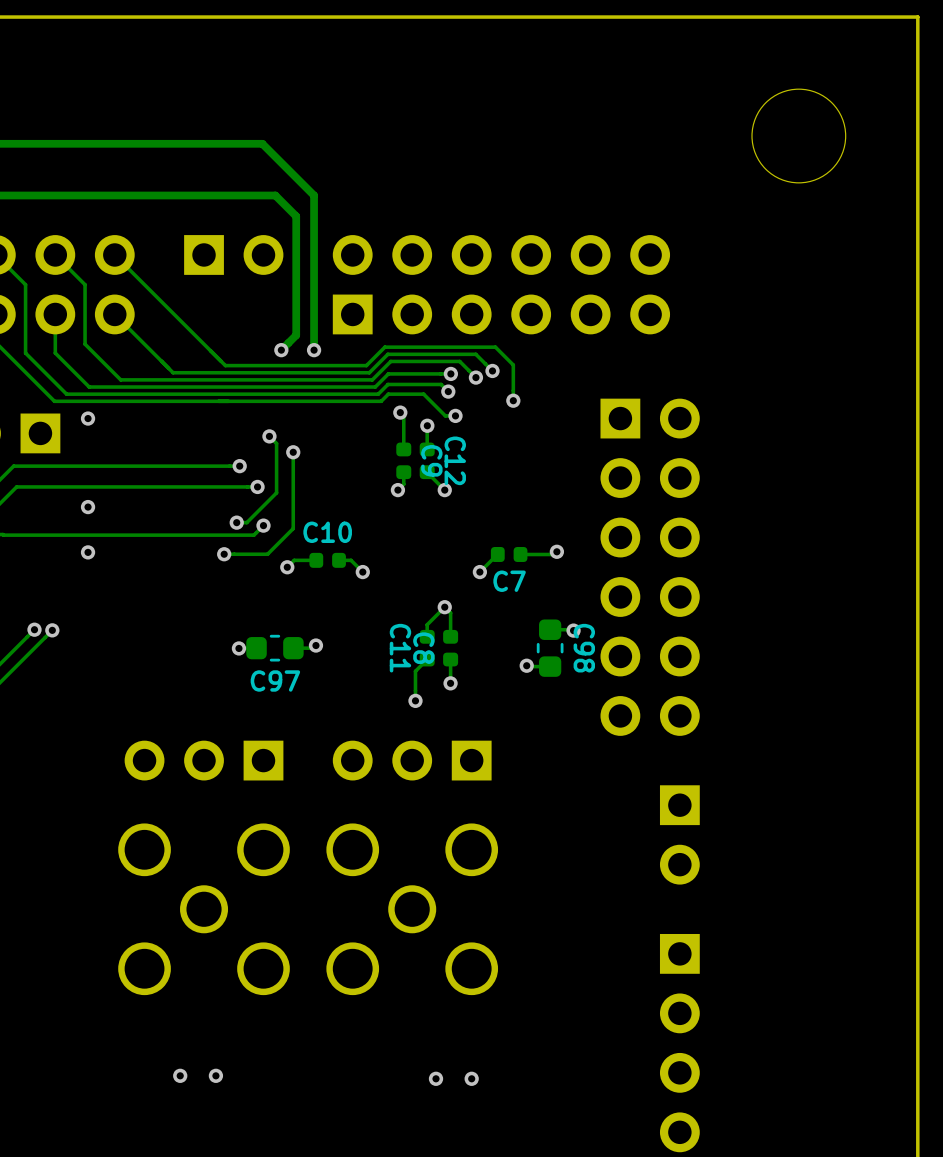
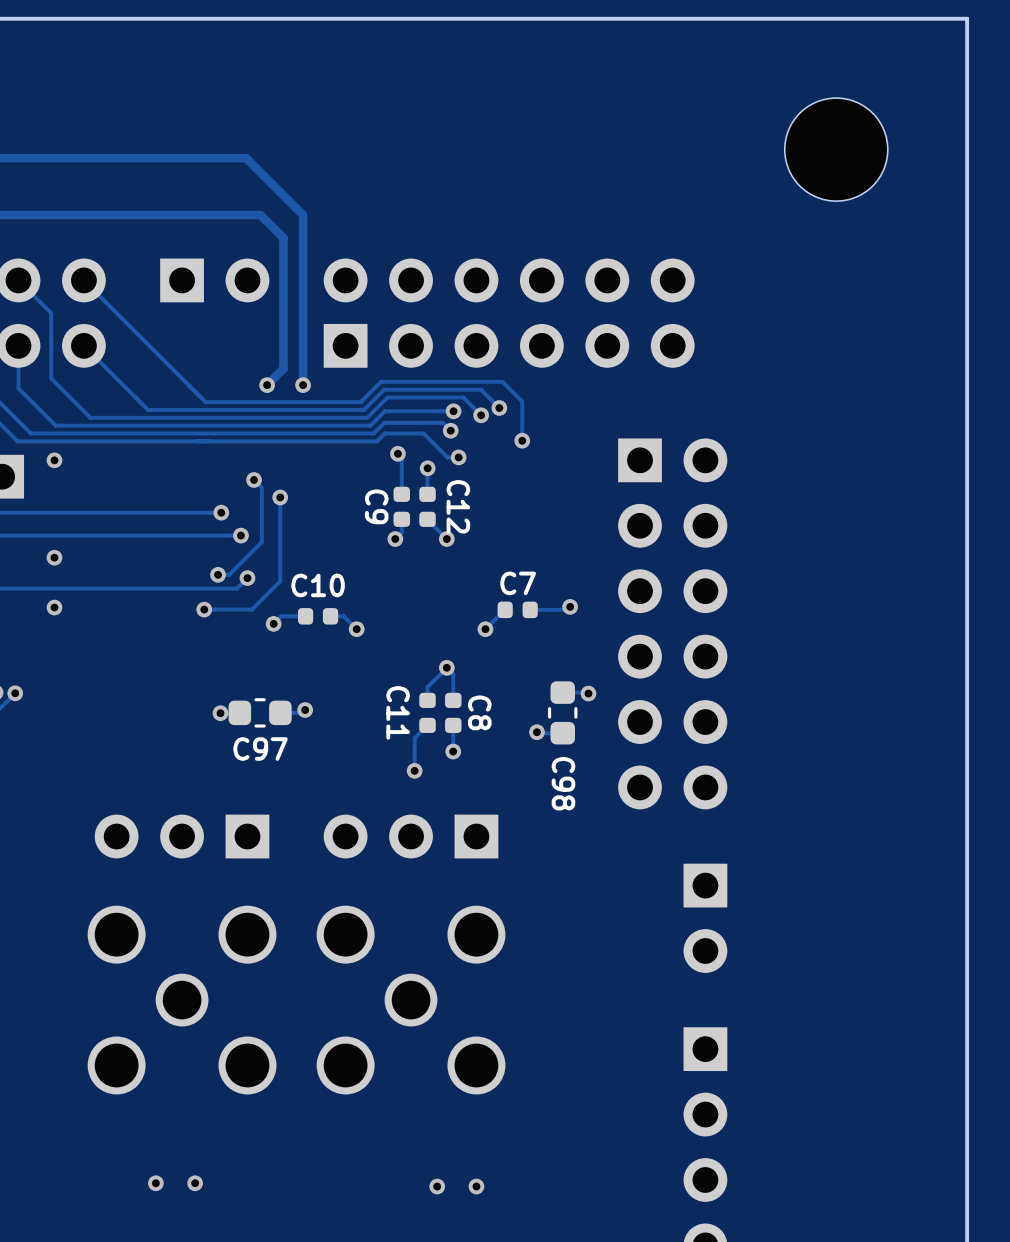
C9 name position: C9 (431, 460) -> C9 (376, 506)
C7 name position: C7 (509, 581) -> C7 (518, 583)
C8 name position: C8 (423, 648) -> C8 (479, 712)
C98 name position: C98 (584, 648) -> C98 (563, 783)

